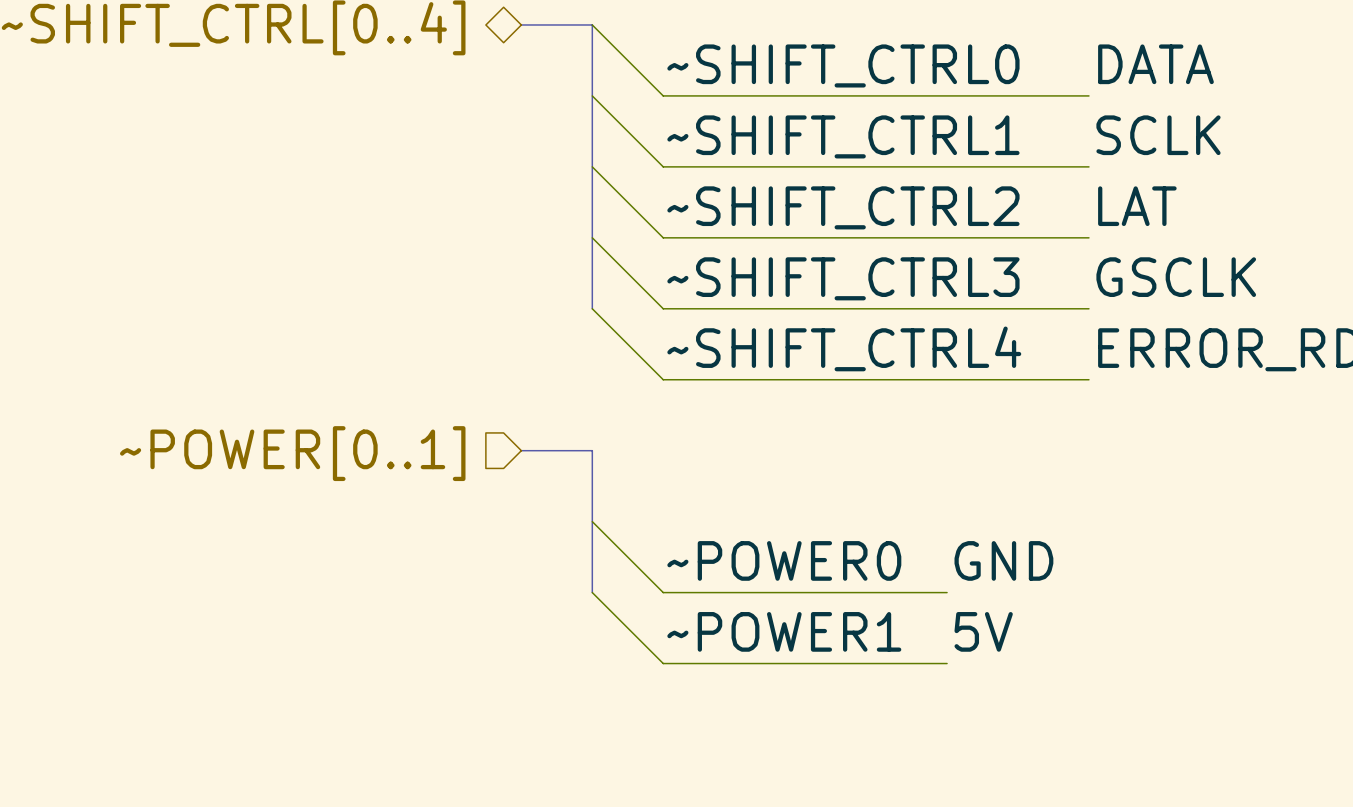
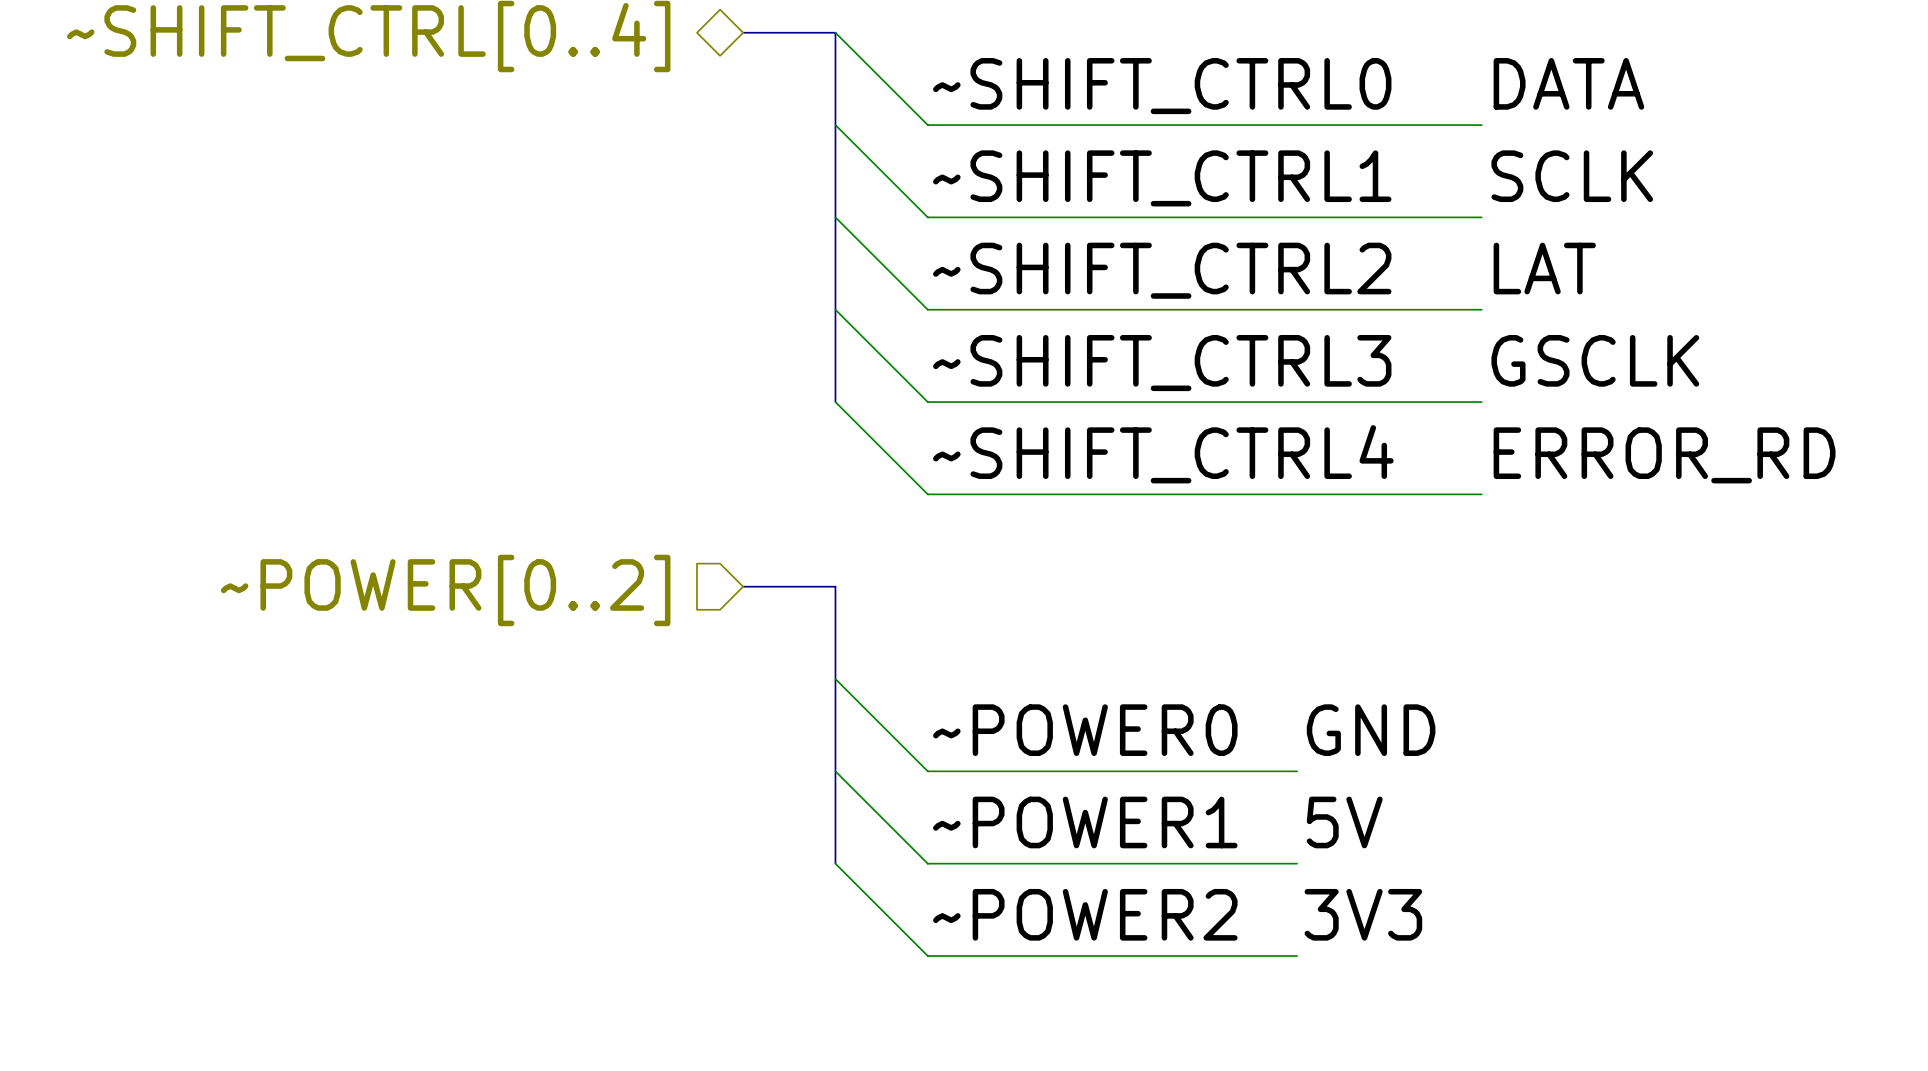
hierarchical label: ~POWER[0..1] (292, 453) -> ~POWER[0..2] (445, 590)
bus: none -> (835, 771) (835, 863)
wire: none -> (835, 863) (927, 955) (1297, 955)
label: none -> ~POWER2 (1085, 914)
label: none -> 3V3 (1363, 914)

